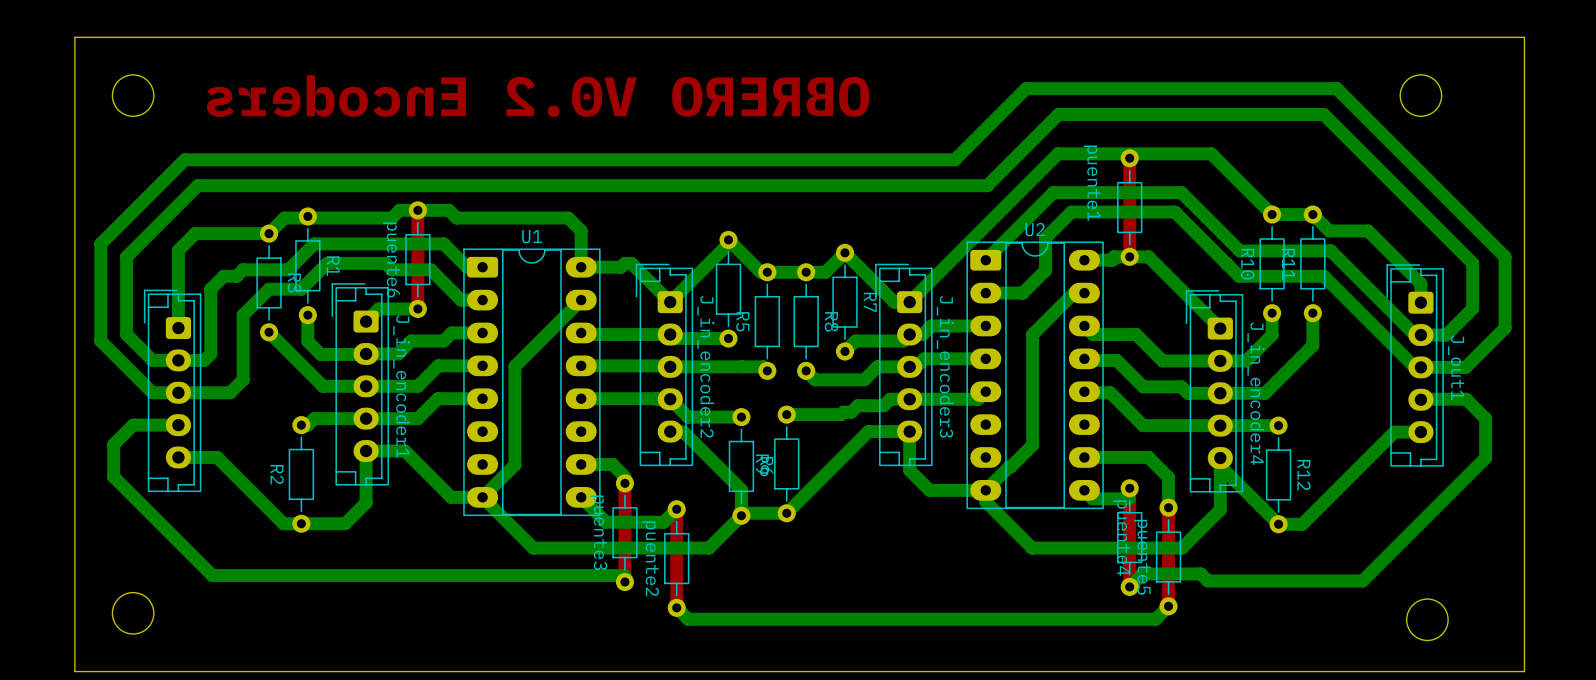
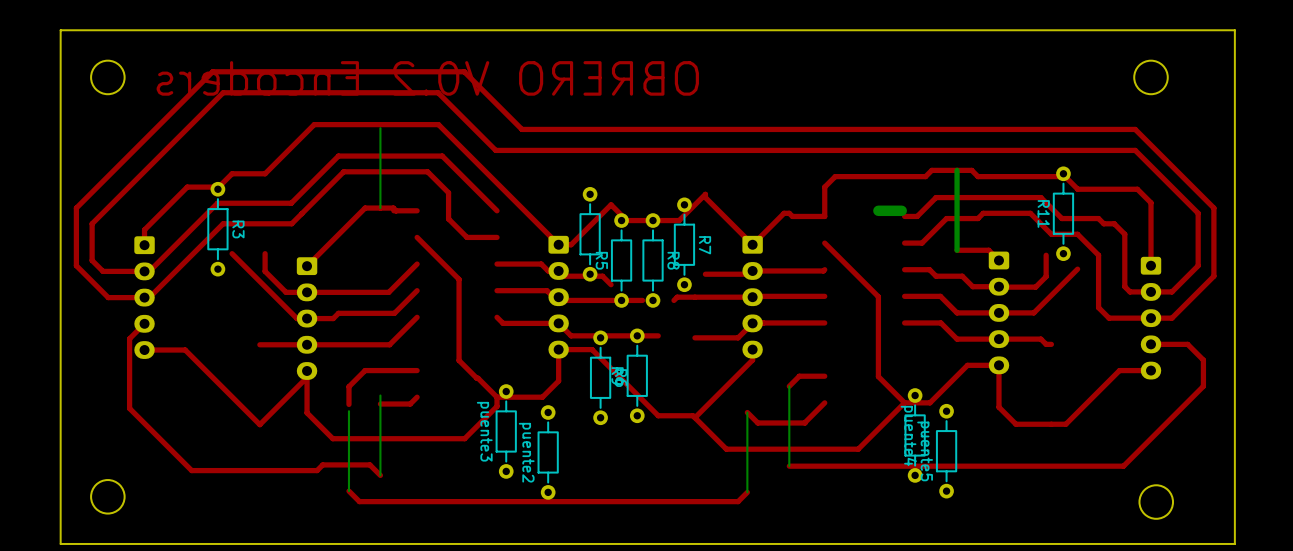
bottom track: none -> (380, 128) (380, 208)
top track: (1129, 158) (1129, 256) -> none
puente1: (1129, 207) -> none
top track: (417, 210) (417, 308) -> none
bottom track: none -> (957, 170) (957, 250)
bottom track: (269, 233) (284, 218) (391, 218) (399, 210) (449, 210) (456, 218) (568, 218) (581, 230) (581, 267) (621, 267) (624, 263) (631, 263) (670, 302) (728, 243) (728, 239) (760, 272) (825, 272) (844, 252) (894, 302) (909, 302) (1058, 153) (1211, 153) (1272, 214) (1312, 214) (1329, 230) (1368, 230) (1420, 283) (1420, 302) -> none
bottom track: (269, 233) (195, 233) (178, 250) (178, 328) -> none
top track: none -> (1077, 189) (1065, 176) (978, 176) (971, 170) (931, 170) (925, 176) (835, 176) (824, 187) (824, 216) (792, 216) (789, 213) (784, 213) (752, 244) (705, 197) (705, 194) (679, 220) (626, 220) (611, 204) (571, 244) (558, 244) (438, 124) (314, 124) (265, 173) (232, 173) (218, 187) (187, 187) (144, 229) (144, 245)
top track: none -> (1077, 189) (1137, 189) (1151, 202) (1151, 265)
puente6: (417, 259) -> none
top track: none -> (396, 210) (393, 208) (365, 208) (307, 266)
top track: none -> (417, 210) (393, 210)
top track: none -> (497, 210) (442, 156) (338, 156) (291, 203) (217, 203) (149, 271) (103, 271) (92, 260) (92, 223) (223, 92) (438, 92) (495, 150) (1135, 150) (1198, 213) (1198, 265) (1171, 291) (1130, 291) (1124, 286) (1124, 234) (1114, 223) (1103, 223) (1098, 218) (1061, 218) (1040, 197) (936, 197) (917, 216) (904, 216)
bottom track: (985, 260) (1053, 192) (1181, 192) (1239, 250) (1330, 250) (1414, 335) (1446, 335) (1472, 308) (1472, 263) (1323, 114) (1058, 114) (987, 185) (197, 185) (126, 256) (126, 334) (152, 360) (204, 360) (210, 353) (210, 289) (223, 276) (236, 276) (243, 269) (288, 269) (314, 243) (443, 243) (467, 267) (482, 267) -> none
bottom track: (1110, 260) (1113, 256) (1148, 256) (1220, 328) -> none
R10: (1272, 263) -> none
R1: (307, 265) -> none
top track: none -> (417, 237) (459, 279) (459, 360) (497, 397)
top track: none -> (497, 237) (467, 237) (448, 218) (448, 192) (427, 171) (343, 171) (291, 223) (223, 223) (149, 297) (108, 297) (76, 265) (76, 208) (212, 71) (464, 71) (521, 129) (1135, 129) (1213, 208) (1213, 276) (1171, 318) (1109, 318) (1098, 307) (1098, 255) (1077, 234) (1051, 234) (1030, 213) (983, 213) (978, 218) (946, 218) (922, 243) (904, 243)
bottom track: (985, 293) (1022, 293) (1045, 270) (1045, 237) (1071, 212) (1175, 212) (1239, 276) (1323, 276) (1414, 367) (1465, 367) (1505, 328) (1505, 256) (1336, 88) (1026, 88) (954, 159) (184, 159) (100, 243) (100, 340) (152, 392) (230, 392) (243, 379) (243, 315) (269, 289) (301, 289) (327, 263) (385, 263) (391, 269) (430, 269) (461, 300) (482, 300) -> none
bottom track: (1084, 293) (1074, 293) (1032, 334) (1032, 445) (985, 490) -> none
bottom track: (581, 300) (514, 366) (514, 464) (482, 497) -> none
top track: none -> (824, 243) (878, 296) (878, 376) (904, 402)
bottom track: (417, 308) (378, 308) (366, 321) -> none
top track: none -> (957, 250) (988, 250) (998, 260)
top track: none -> (232, 253) (296, 318) (333, 318) (338, 313) (394, 313) (417, 290)
top track: none -> (265, 253) (265, 271) (286, 292) (388, 292) (417, 264)
bottom track: (1272, 313) (1272, 335) (1246, 360) (1162, 360) (1136, 334) (1092, 334) (1084, 325) -> none
bottom track: (1312, 313) (1312, 345) (1265, 393) (1187, 393) (1181, 386) (1143, 386) (1116, 360) (1084, 358) -> none
bottom track: (307, 315) (307, 341) (320, 354) (398, 353) (411, 340) (443, 340) (451, 332) (482, 332) -> none
top track: none -> (1046, 255) (1046, 276) (1035, 287) (972, 286) (962, 276) (936, 276) (929, 269) (904, 269)
top track: none -> (497, 264) (541, 264) (548, 270) (558, 270) (563, 276) (602, 276) (611, 284)
bottom track: (985, 325) (931, 325) (922, 334) (909, 334) (903, 340) (855, 340) (844, 351) -> none
bottom track: (269, 332) (323, 386) (417, 386) (438, 365) (482, 365) -> none
bottom track: (581, 332) (582, 334) (670, 334) (674, 338) (728, 338) -> none
top track: none -> (824, 269) (752, 270) (749, 274) (705, 274)
top track: none -> (1077, 269) (1033, 312) (957, 312) (940, 296) (904, 296)
top track: none -> (497, 290) (546, 290) (553, 297) (558, 297) (561, 300) (642, 300)
bottom track: (985, 358) (924, 358) (916, 366) (877, 366) (864, 379) (815, 379) (806, 370) -> none
J_in_encoder2 side: bottom (664, 364) -> top (752, 297)
J_in_encoder3 side: bottom (903, 364) -> top (558, 297)
bottom track: (581, 365) (763, 366) (767, 370) -> none
top track: none -> (824, 296) (677, 297) (673, 300)
J_out1: (1415, 365) -> none
part: none -> (144, 297)
U2: (1035, 375) -> none
U1: (531, 382) -> none
J_in_encoder1: (360, 384) -> none
part: none -> (998, 312)
part: (172, 390) -> none
top track: none -> (417, 317) (389, 344) (259, 344)
top track: none -> (497, 317) (503, 323) (558, 323) (571, 335) (658, 335)
bottom track: (985, 391) (978, 399) (890, 399) (883, 405) (857, 405) (851, 412) (843, 412) (840, 414) (786, 414) -> none
bottom track: (1084, 391) (1110, 392) (1143, 425) (1278, 425) -> none
J_in_encoder4: (1214, 391) -> none
part: none -> (1151, 318)
part: none -> (307, 318)
bottom track: (482, 398) (437, 398) (417, 418) (314, 418) (307, 425) (301, 425) -> none
bottom track: (581, 398) (670, 399) (688, 417) (741, 417) -> none
top track: none -> (824, 322) (752, 323) (738, 337) (694, 337)
top track: none -> (904, 322) (940, 322) (957, 339) (1040, 339) (1046, 344) (1051, 344)
top track: none -> (144, 323) (129, 338) (129, 408) (191, 470) (317, 470) (322, 464) (369, 464) (380, 475)
bottom track: (1420, 399) (1466, 399) (1485, 418) (1485, 457) (1362, 580) (1207, 580) (1200, 573) (1142, 573) (1129, 586) -> none
bottom track: (178, 425) (133, 425) (113, 444) (113, 476) (212, 575) (624, 575) -> none
top track: none -> (1151, 344) (1187, 344) (1203, 360) (1203, 386) (1123, 466) (789, 466)
bottom track: (670, 431) (684, 432) (741, 489) (741, 515) -> none
top track: none -> (752, 349) (752, 360) (694, 417)
top track: none -> (144, 350) (185, 350) (259, 424) (307, 377)
bottom track: (1420, 432) (1394, 432) (1302, 524) (1278, 524) (1220, 466) -> none
bottom track: (178, 457) (217, 457) (283, 523) (345, 523) (366, 502) (366, 451) (404, 451) (451, 497) (482, 497) -> none
top track: none -> (307, 370) (307, 412) (332, 438) (464, 438) (497, 406) (497, 397)
top track: none -> (417, 370) (365, 370) (348, 386) (348, 404)
bottom track: (1084, 457) (1148, 457) (1168, 477) (1168, 499) -> none
bottom track: (1220, 457) (1220, 509) (1182, 548) (1032, 548) (985, 501) (985, 490) -> none
top track: none -> (1151, 370) (1119, 370) (1065, 424) (1015, 424) (998, 407) (998, 365) (967, 365) (930, 402) (904, 402)
bottom track: (581, 464) (612, 464) (624, 476) -> none
top track: none -> (824, 376) (799, 376) (789, 386)
R2: (301, 474) -> none
R12: (1278, 474) -> none
top track: (624, 476) (624, 575) -> none
bottom track: none -> (789, 386) (789, 466)
bottom track: none -> (380, 395) (380, 475)
top track: (1129, 488) (1129, 586) -> none
top track: none -> (417, 397) (410, 404) (380, 404)
top track: none -> (497, 397) (542, 397) (558, 381) (558, 349) (592, 349) (658, 415) (692, 415) (726, 449) (858, 449) (904, 402)
bottom track: (985, 490) (929, 490) (909, 470) (909, 431) (868, 431) (786, 513) (743, 513) (709, 548) (533, 548) (482, 497) -> none
bottom track: (1084, 490) (1092, 498) (1129, 498) -> none
bottom track: (581, 497) (605, 522) (663, 522) (676, 509) -> none
top track: none -> (824, 402) (805, 422) (757, 422) (747, 412)
bottom track: none -> (348, 411) (348, 491)
top track: (1168, 507) (1168, 606) -> none
top track: (676, 509) (676, 607) -> none
bottom track: none -> (747, 412) (747, 492)
top track: none -> (348, 491) (359, 501) (738, 501) (747, 492)
bottom track: (1168, 606) (1155, 619) (688, 619) (676, 607) -> none

